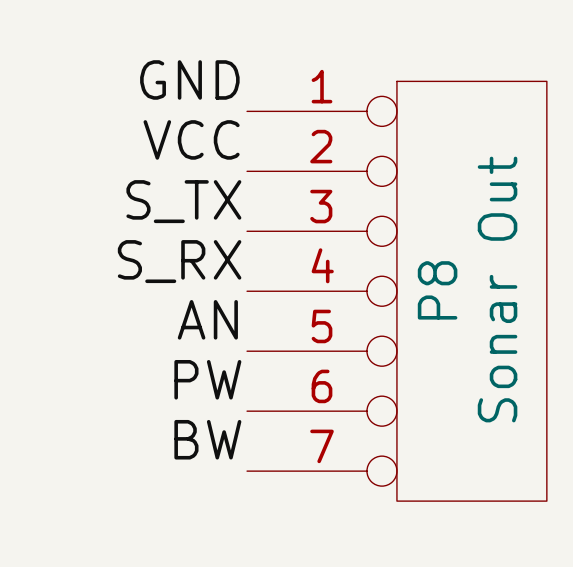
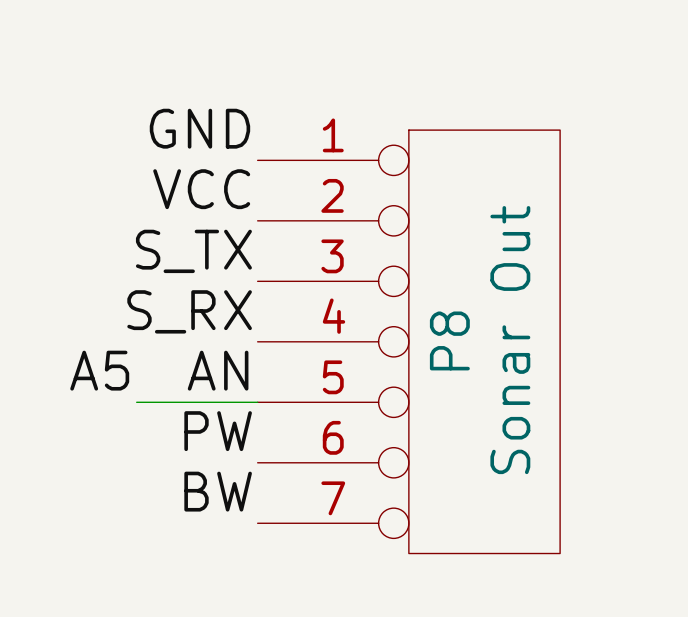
label: none -> A5 (99, 370)
wire: none -> (136, 402) (257, 402)

